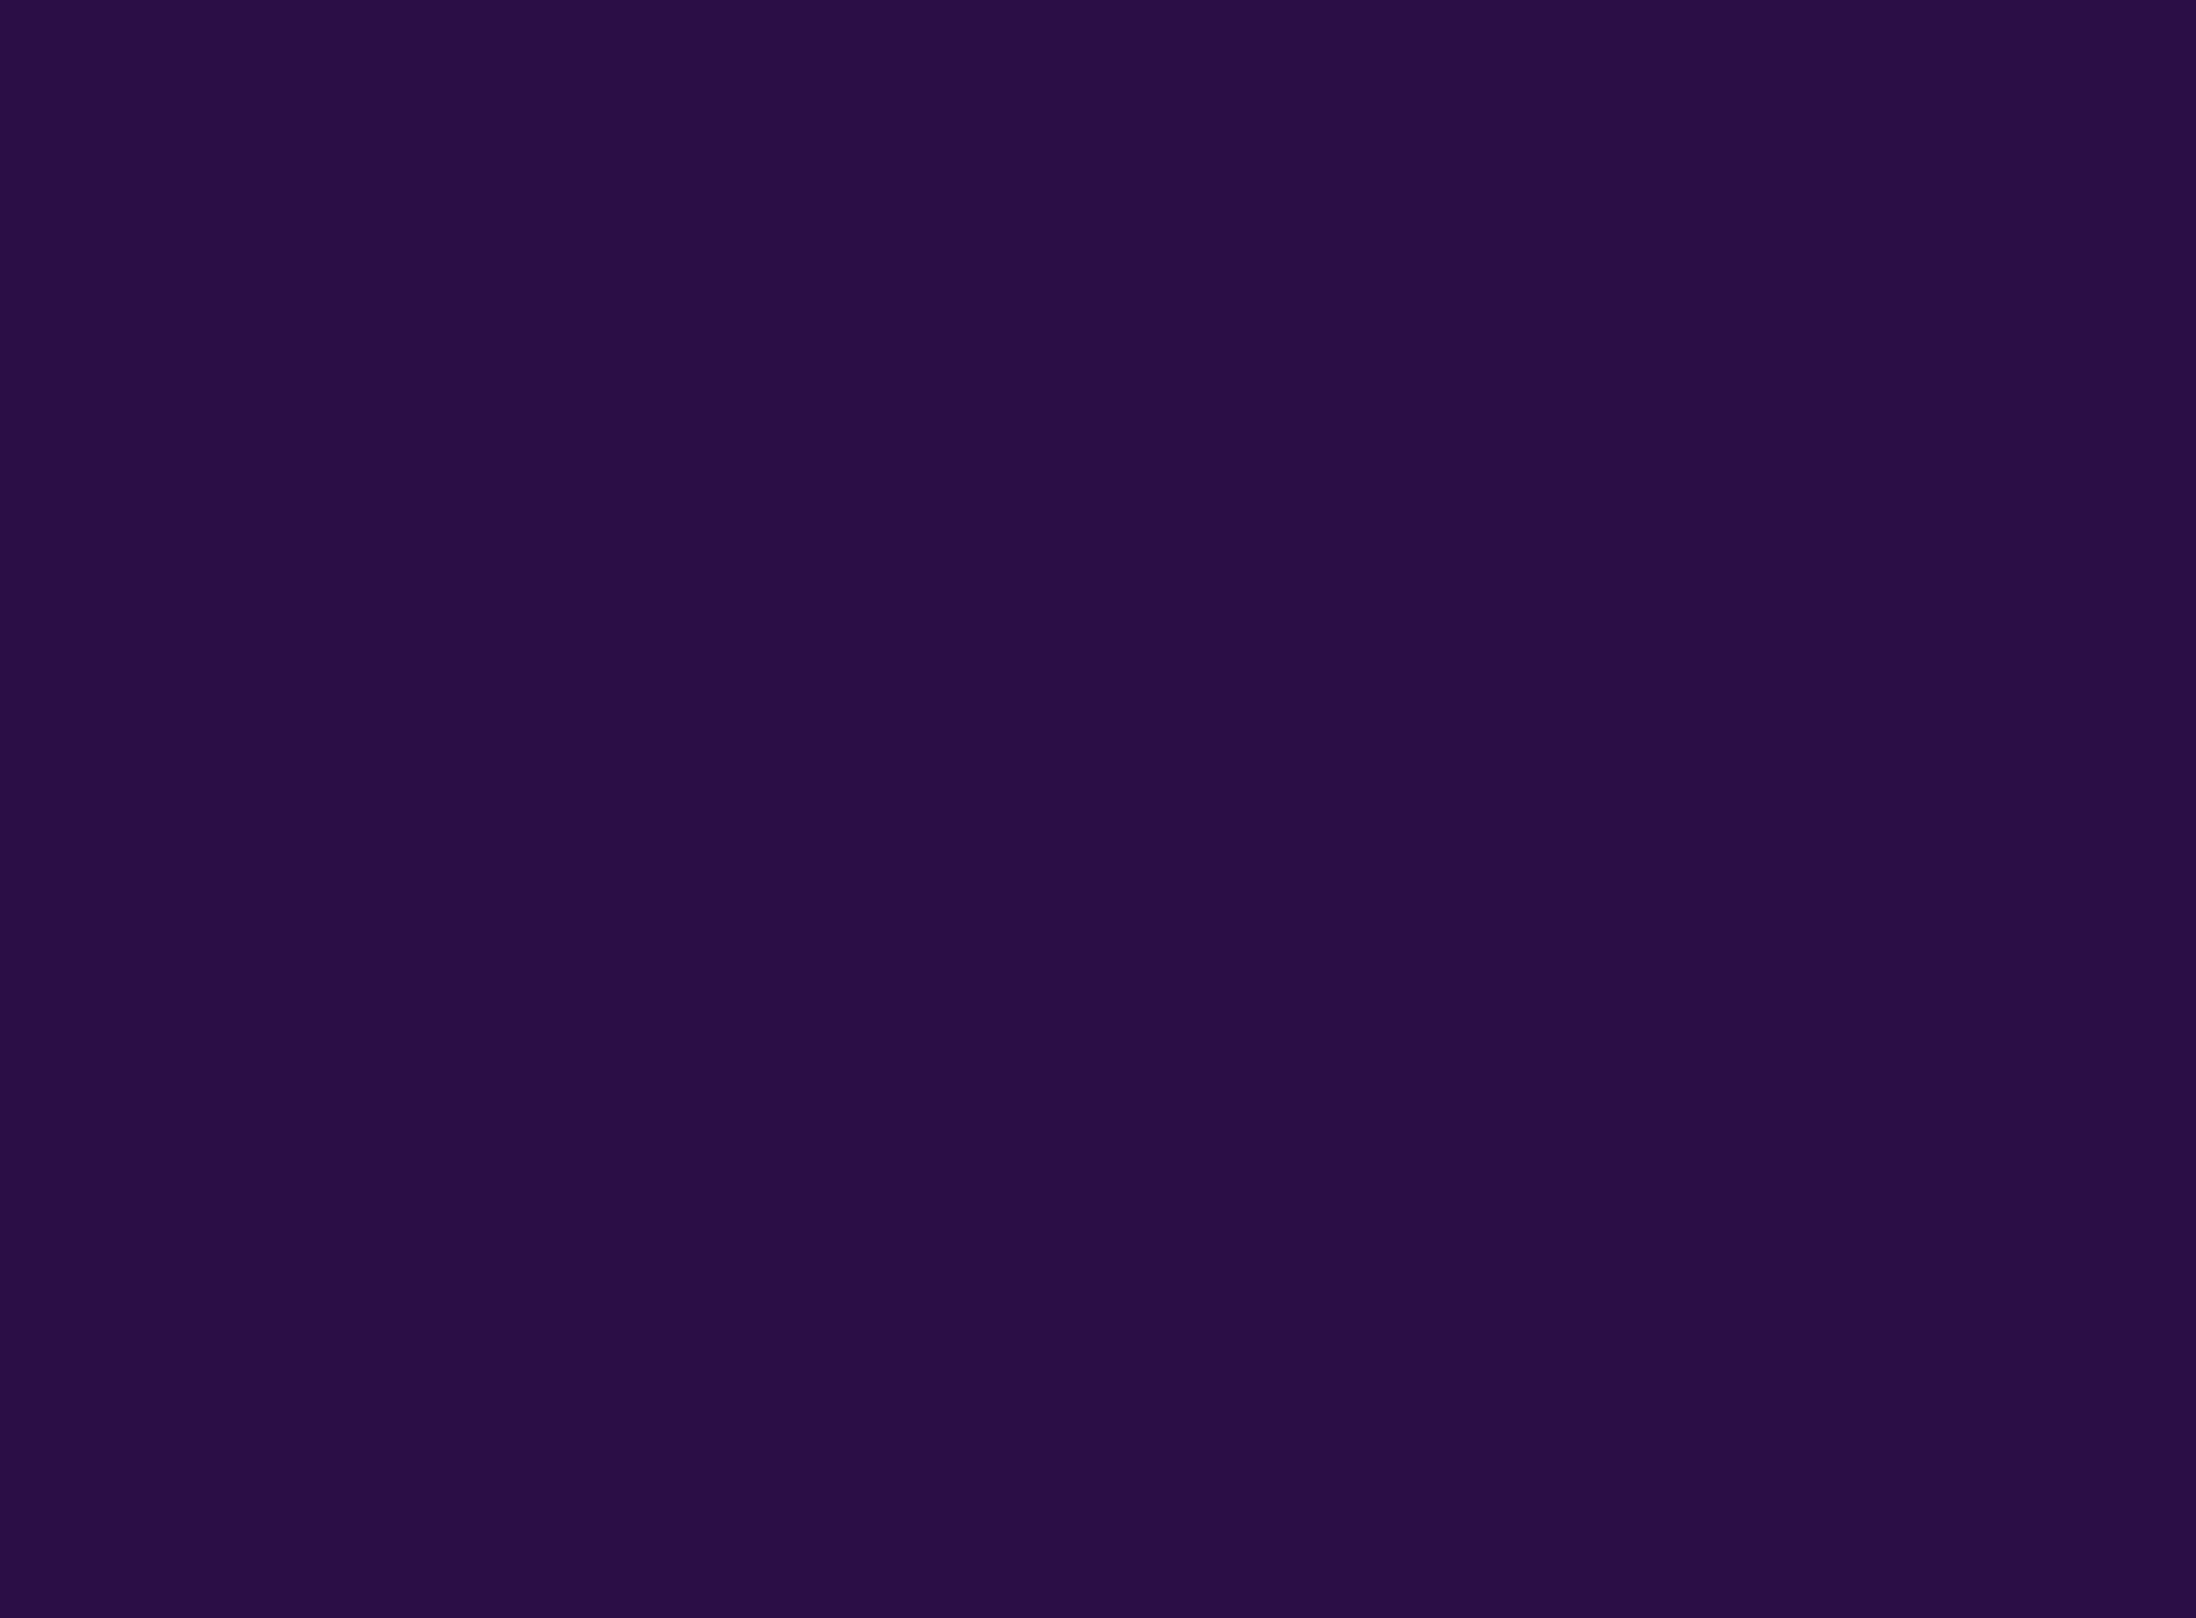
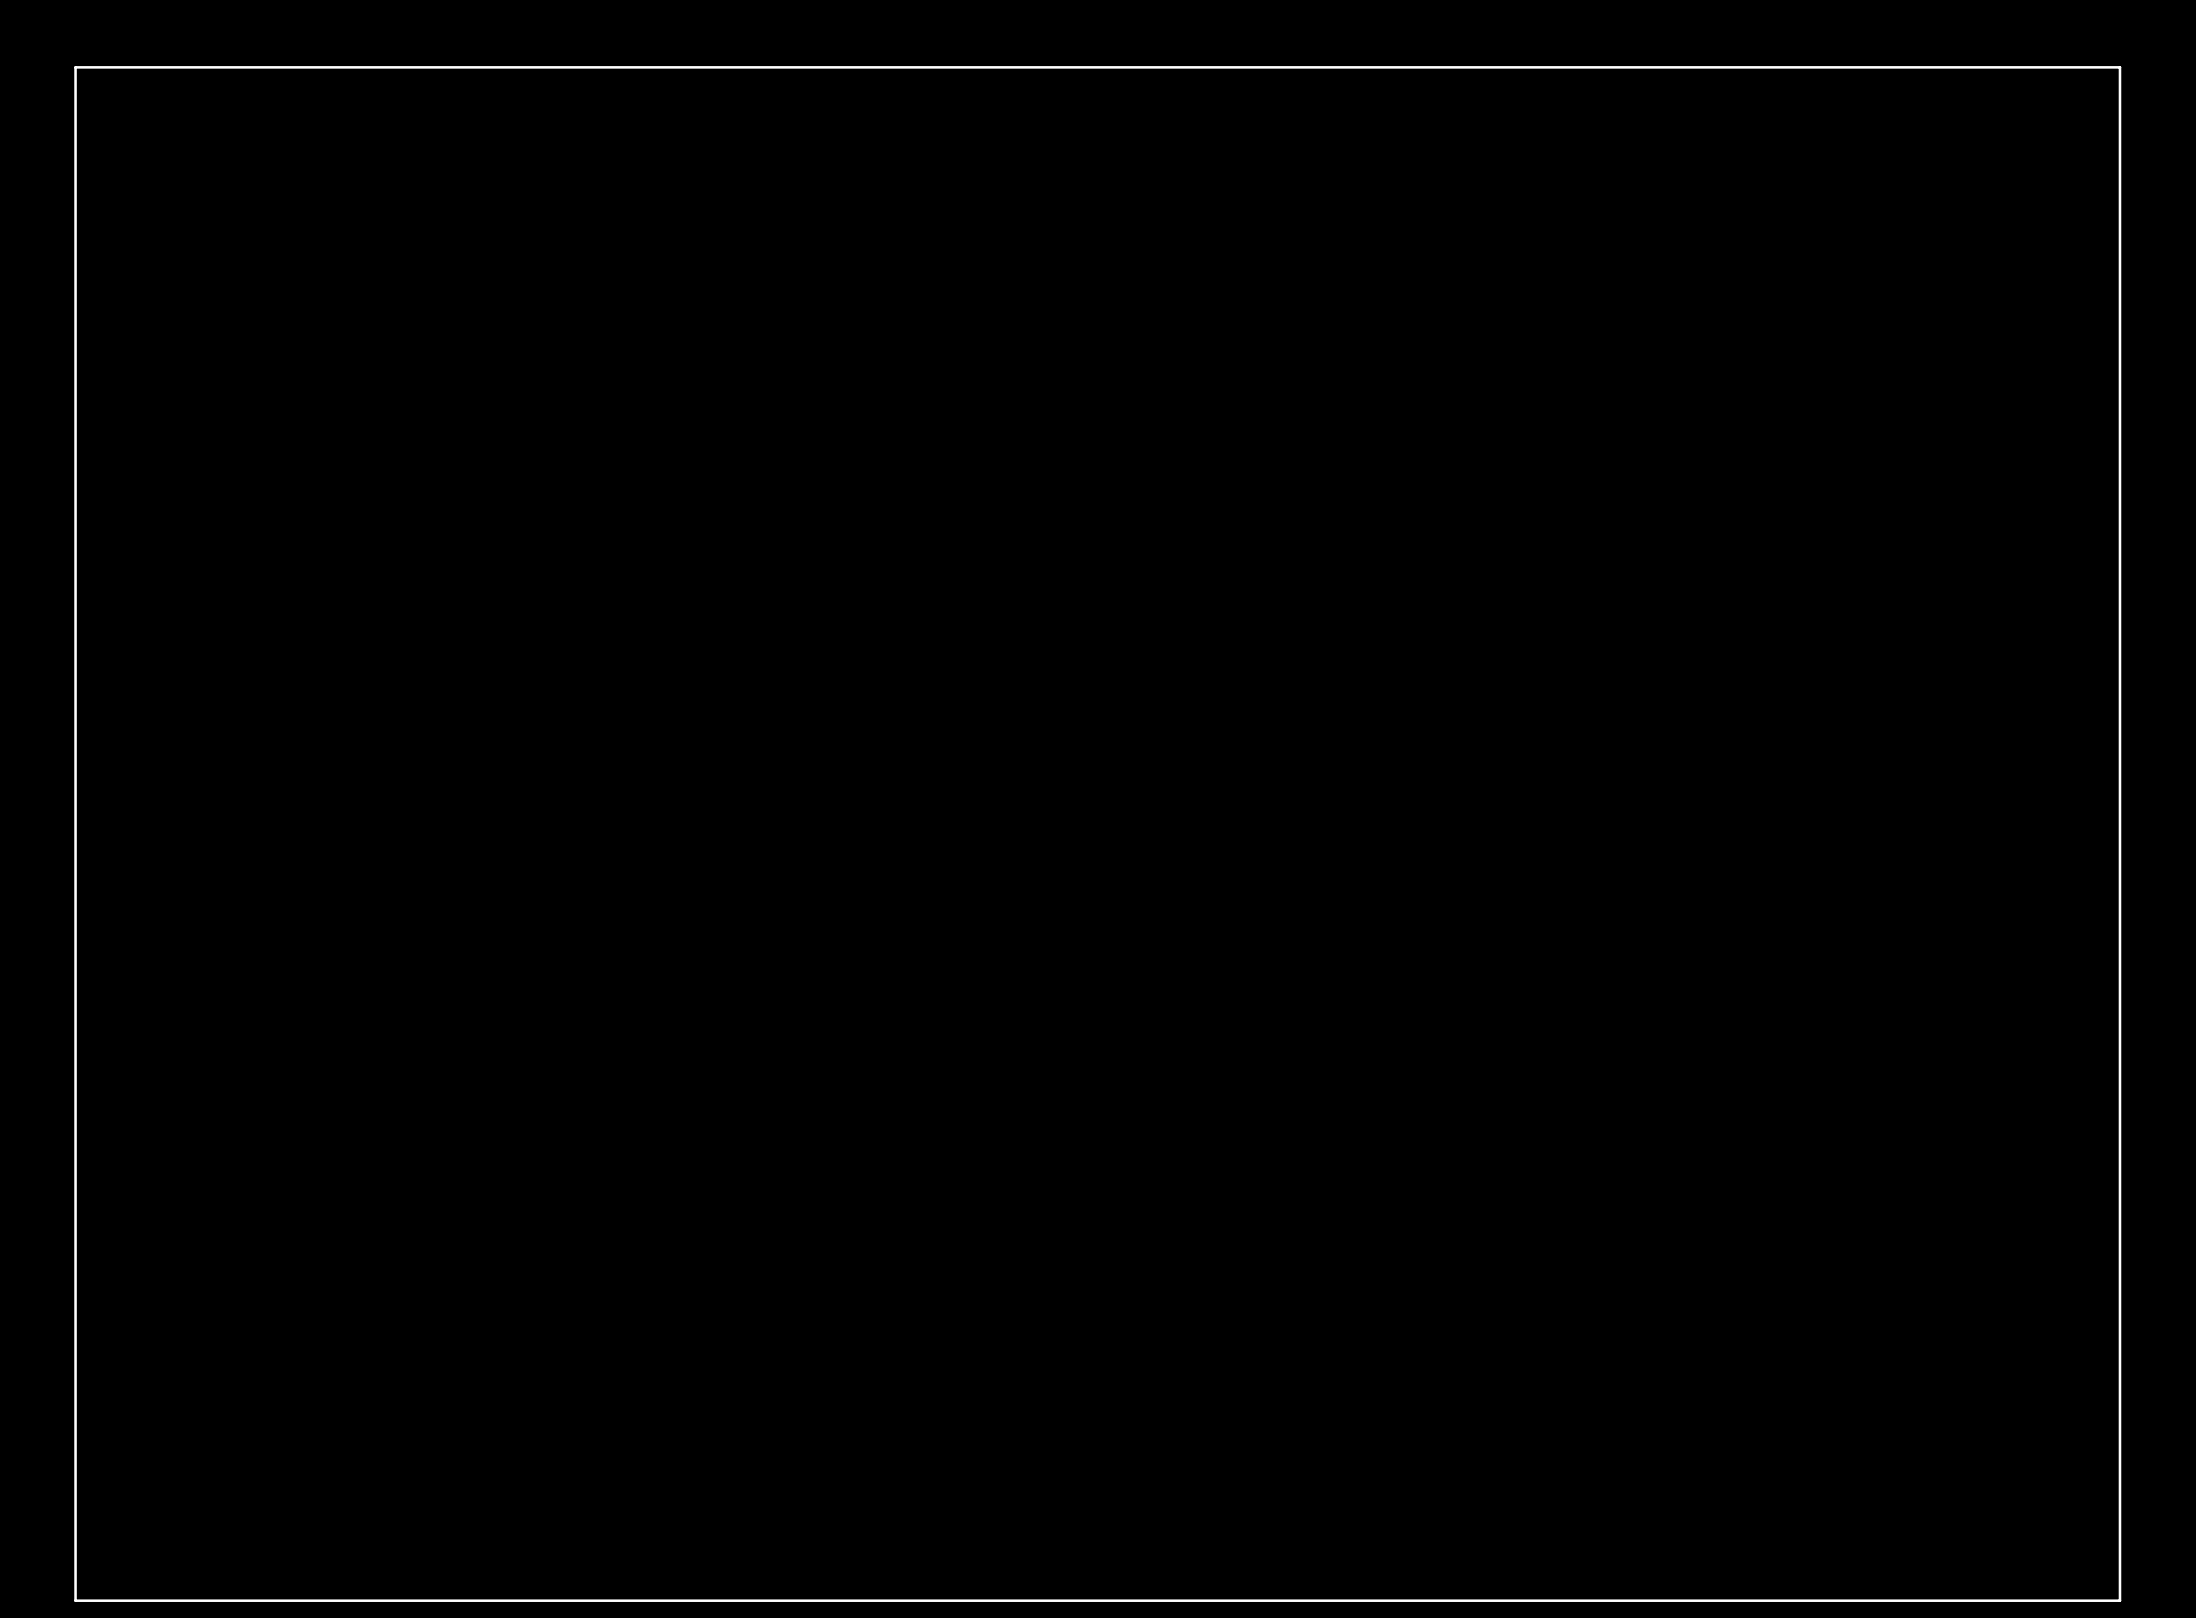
board edge: none -> (75, 67) (2119, 67) (2119, 1600) (75, 1600) (75, 67)

